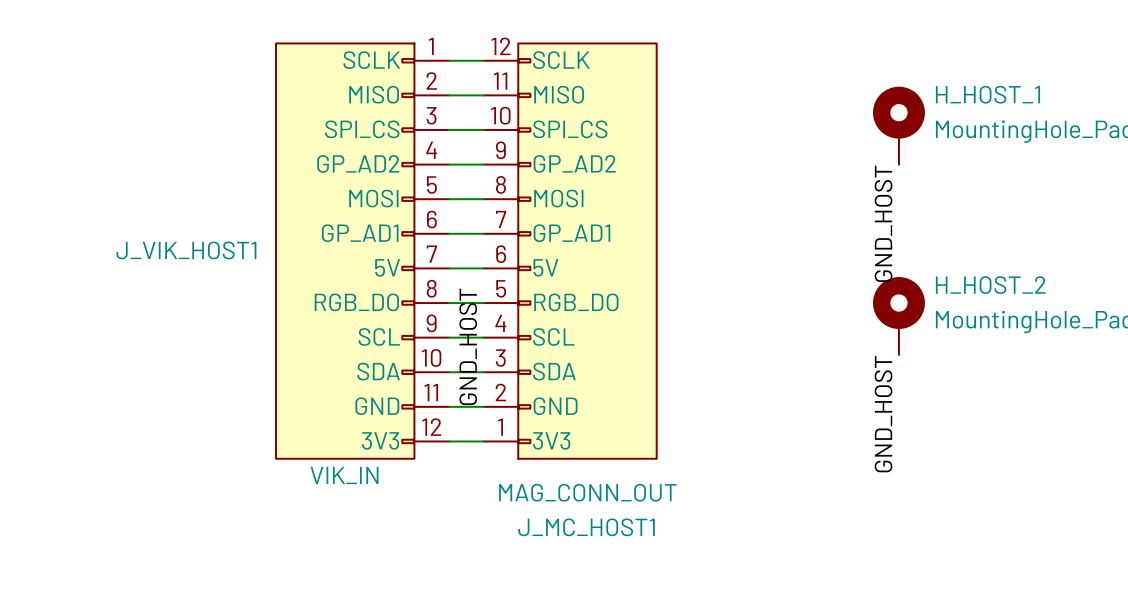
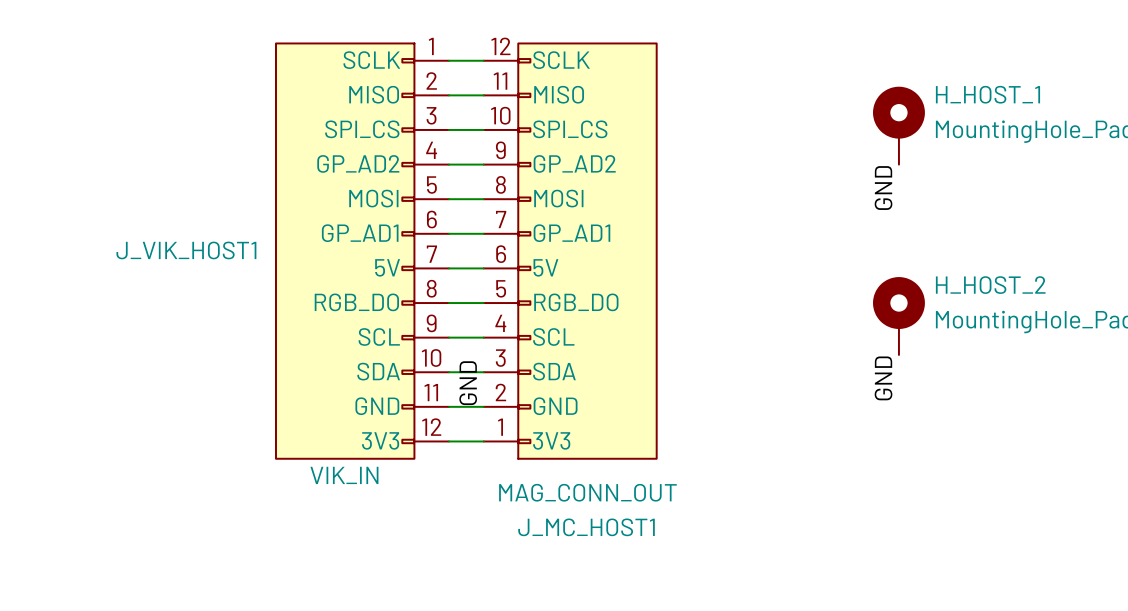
label: GND_HOST (883, 223) -> GND (883, 188)
label: GND_HOST (468, 346) -> GND (468, 383)
label: GND_HOST (883, 414) -> GND (883, 378)

